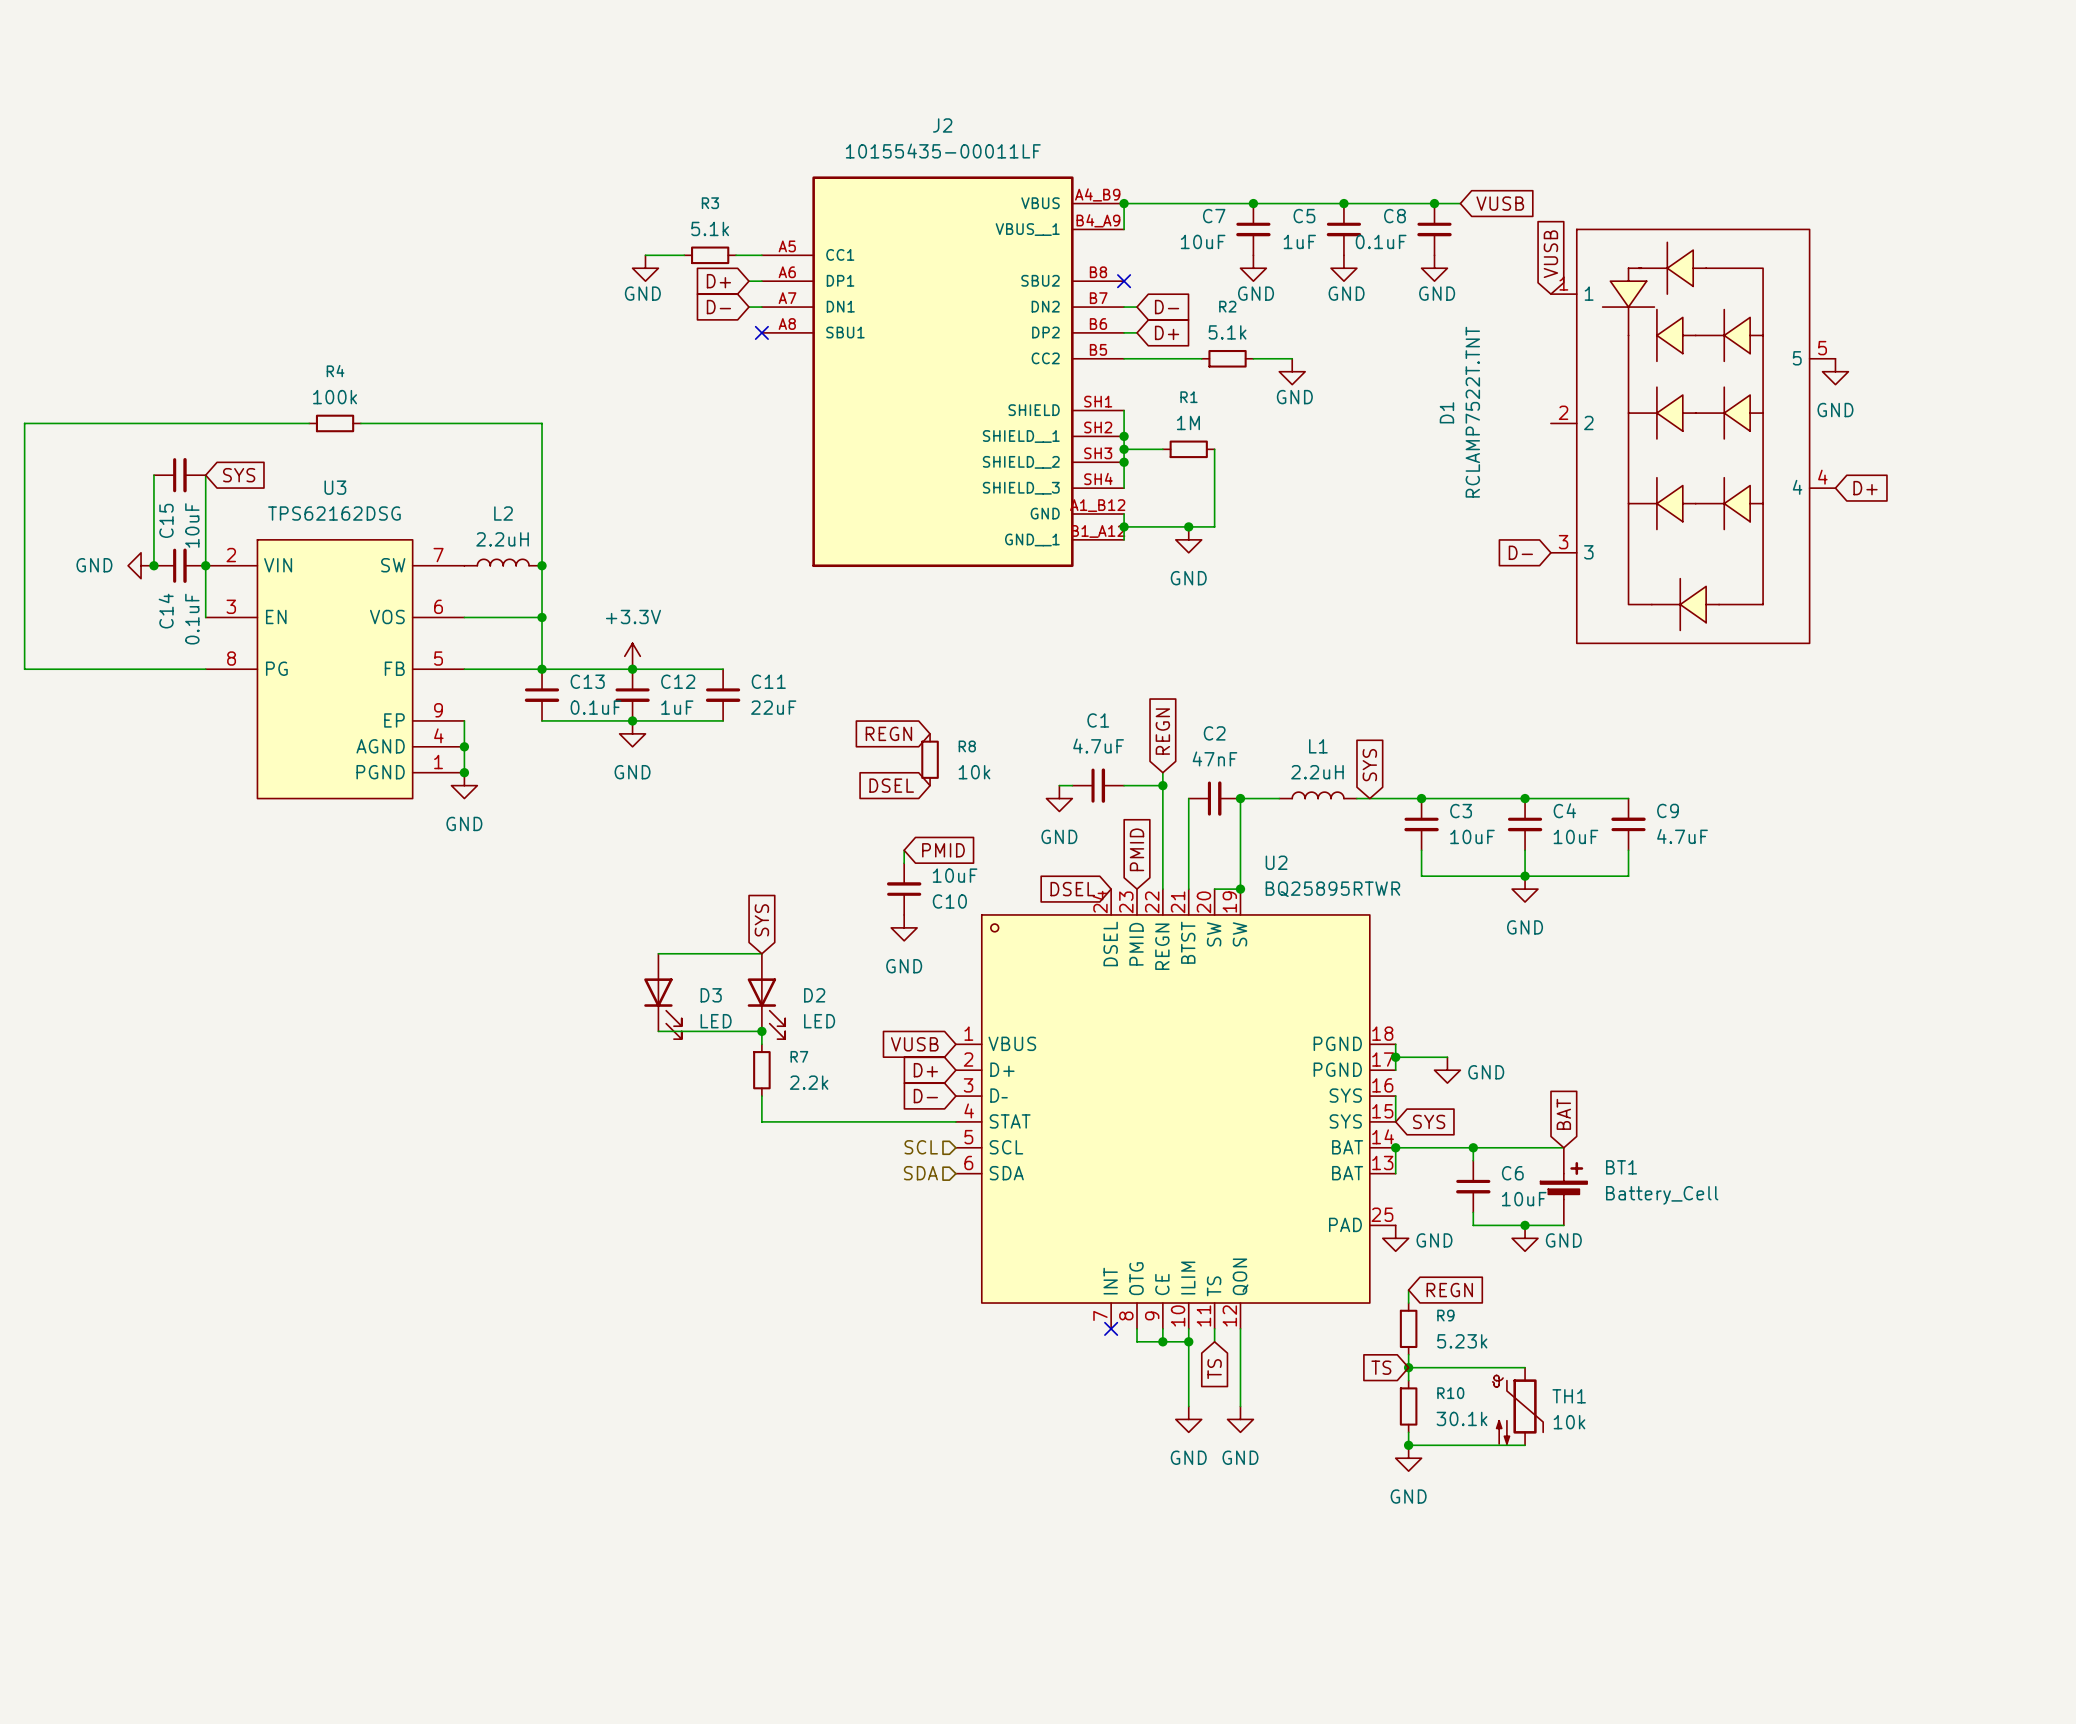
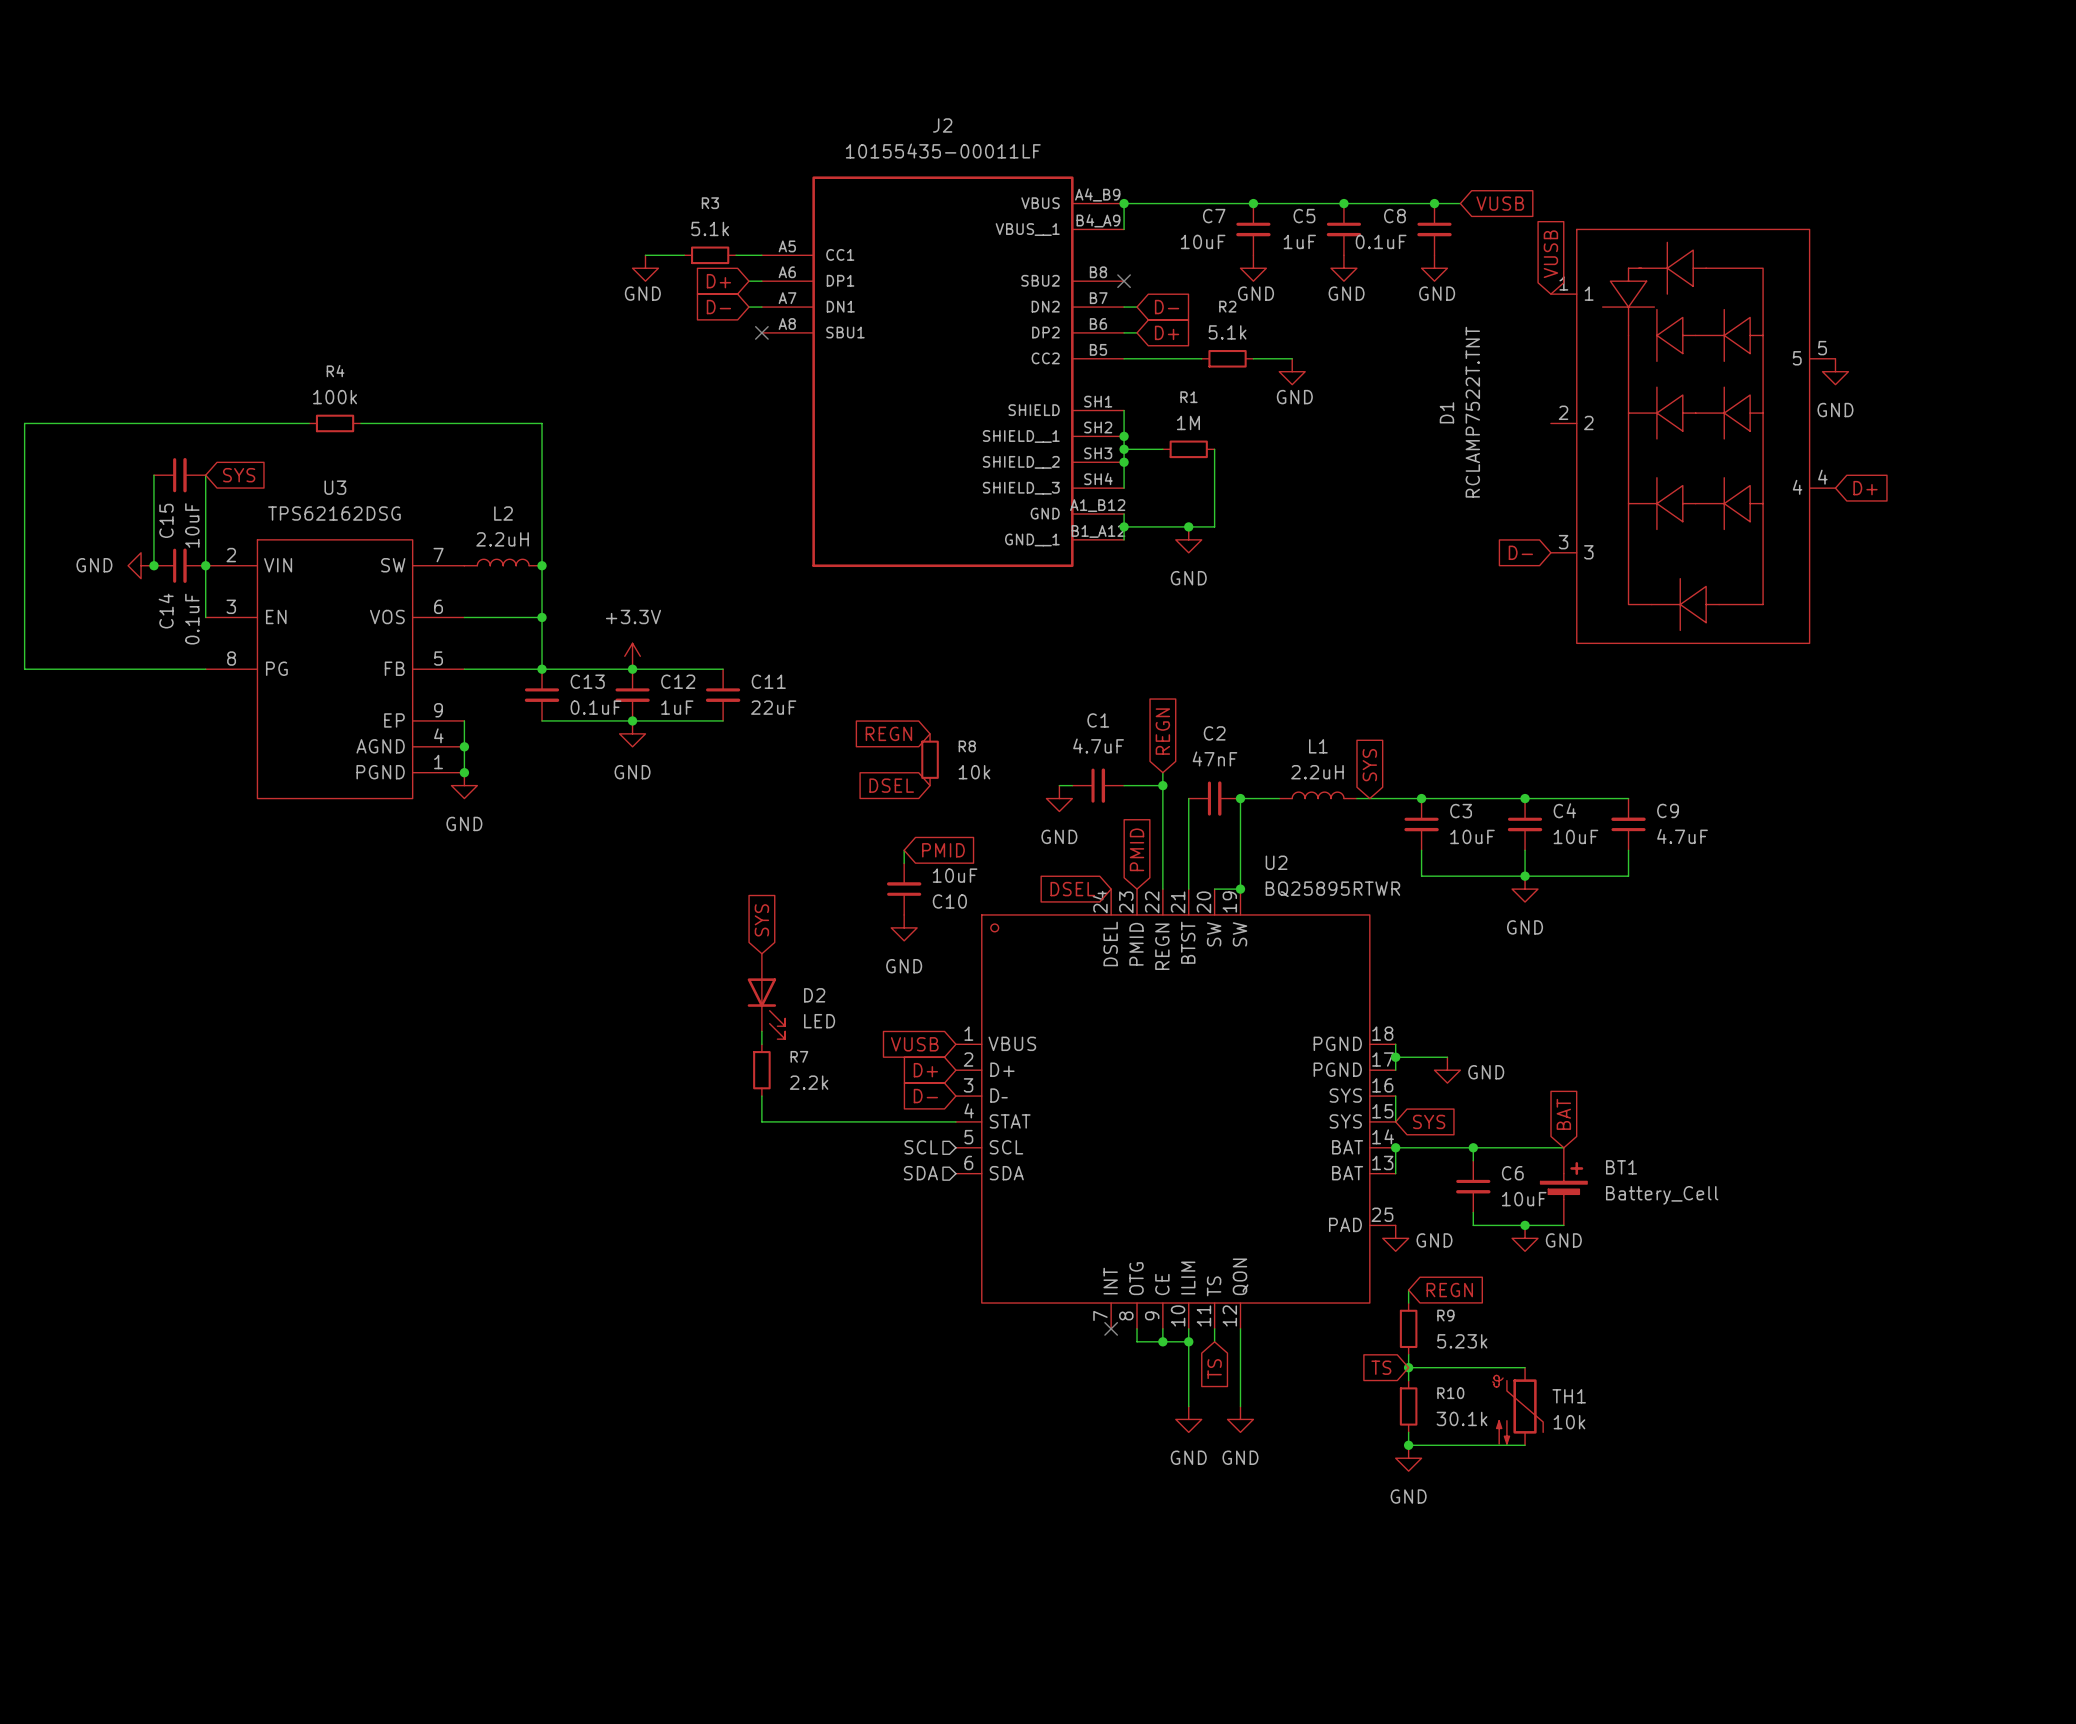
wire: (658, 953) (761, 953) -> none
D3: LED (662, 996) -> none
wire: (658, 1031) (761, 1031) -> none
junction: (761, 1031) -> none

